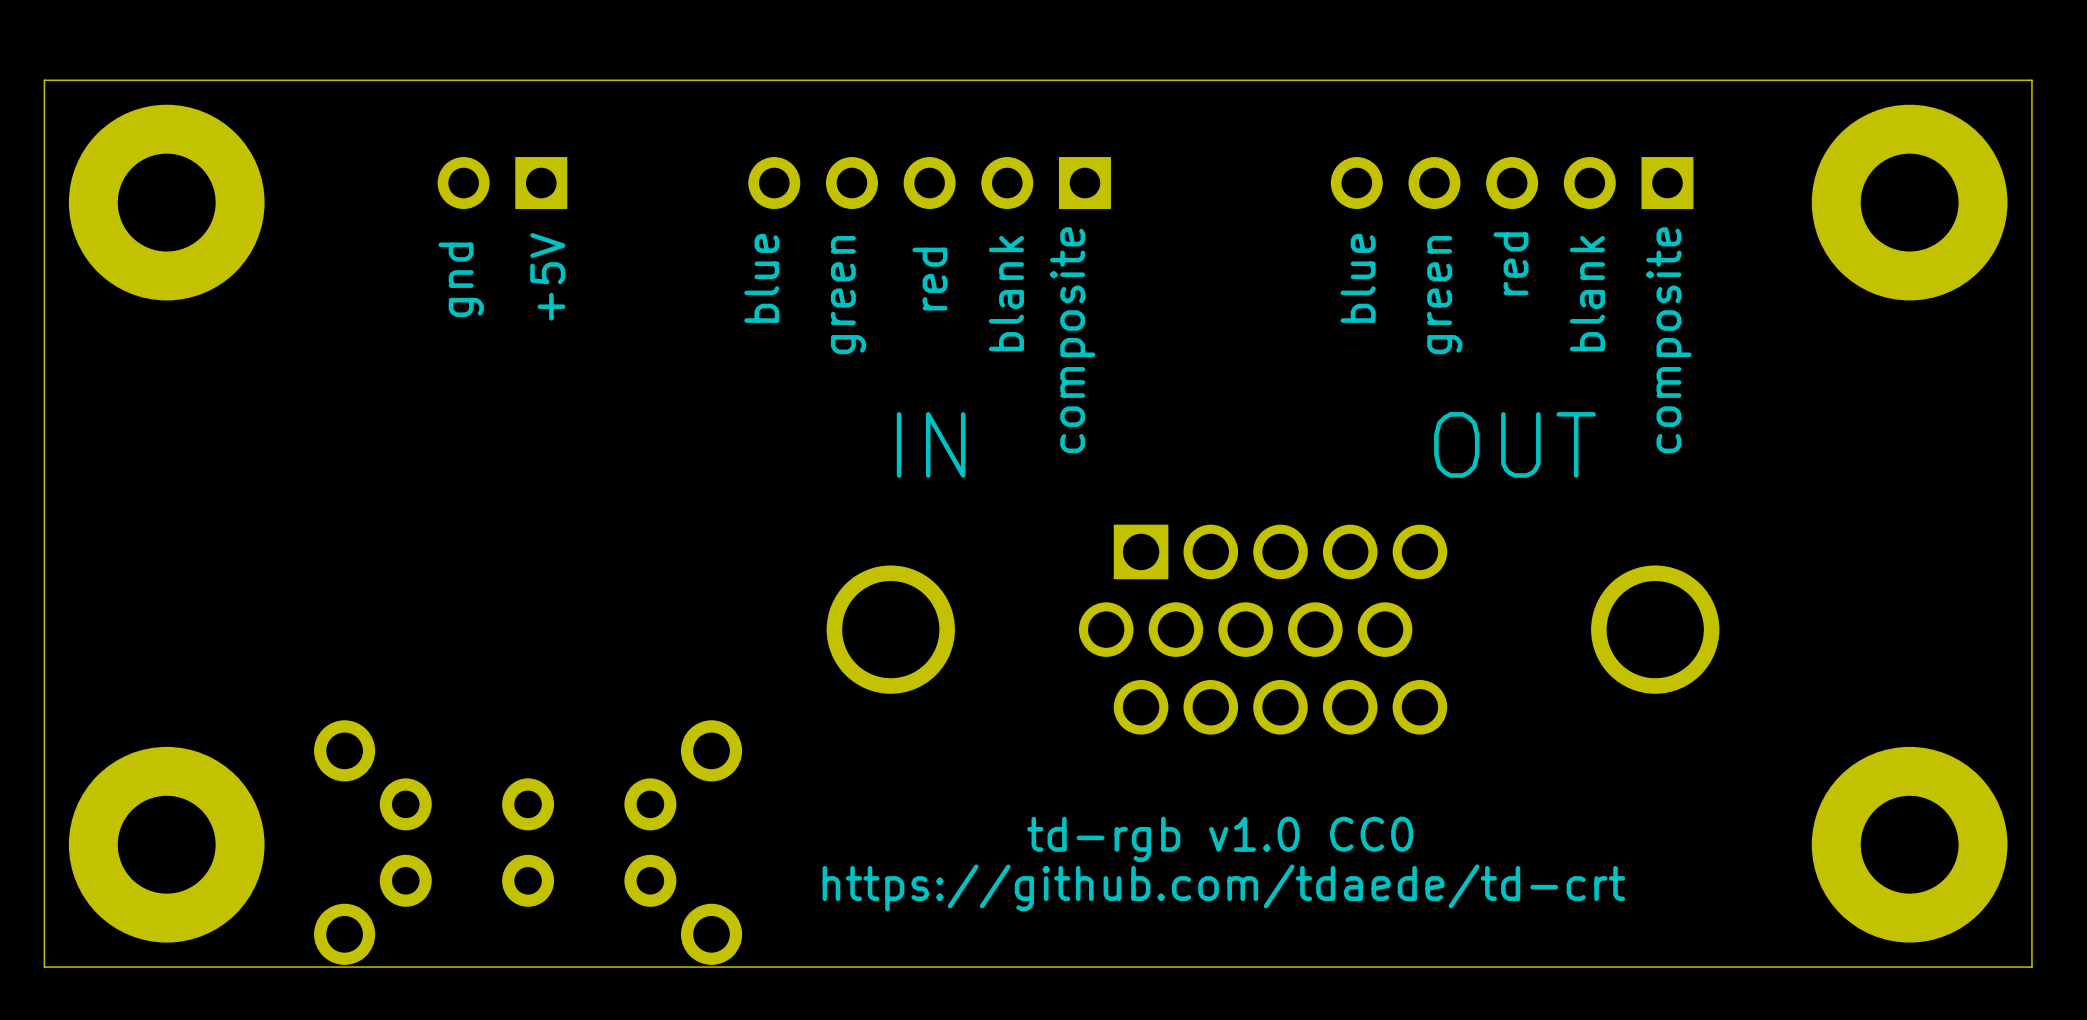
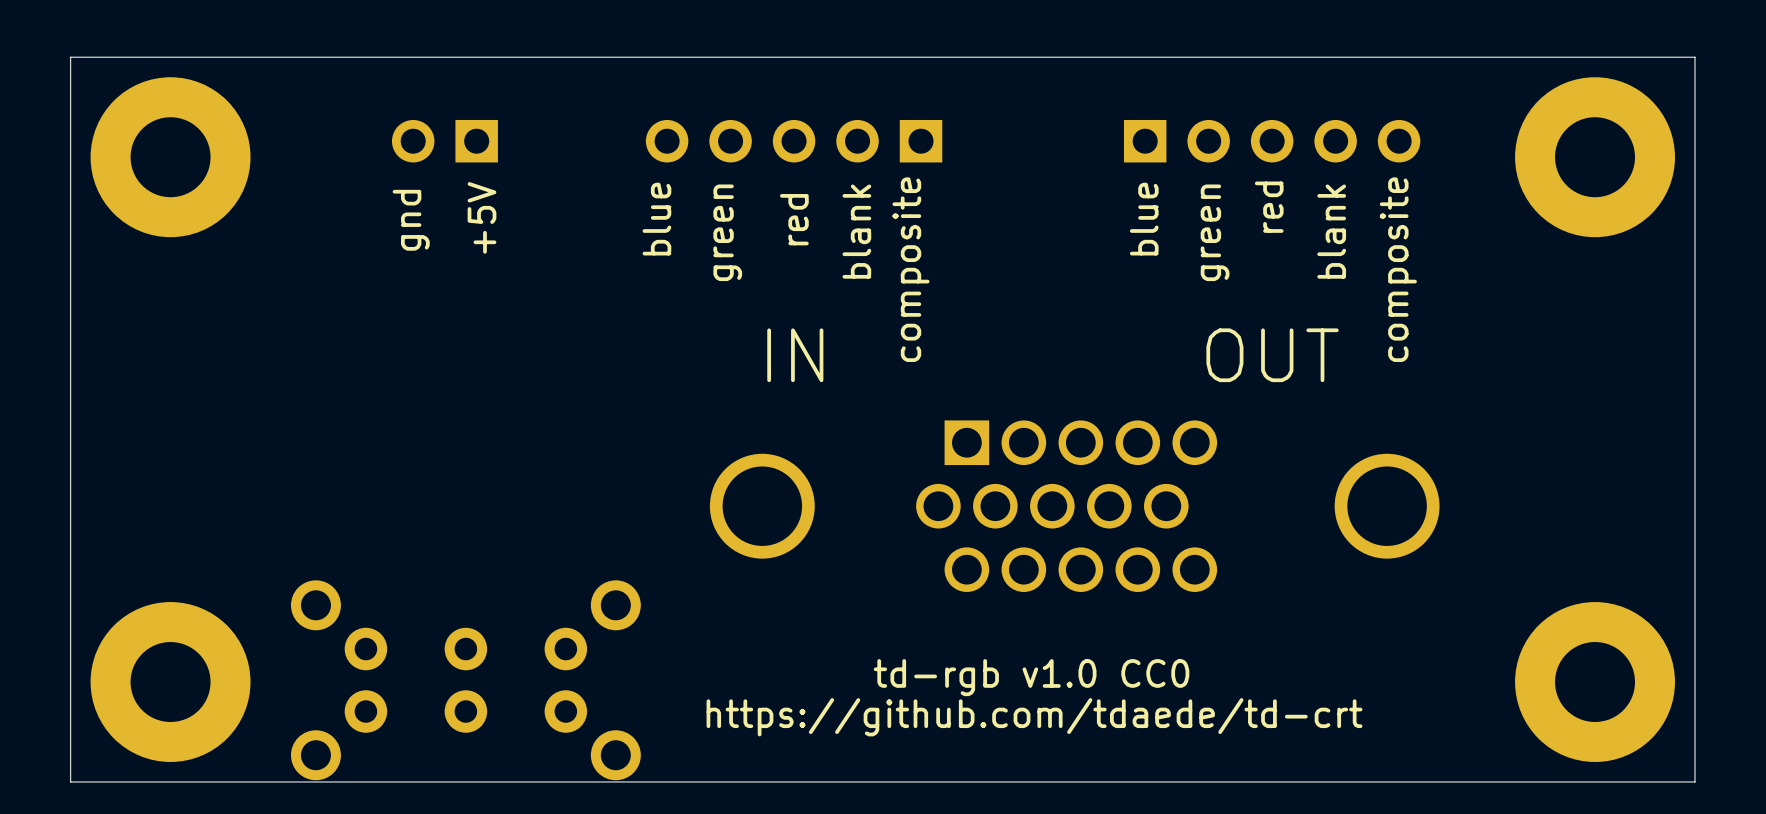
part rotation: 0° (1512, 183) -> 180° (1272, 141)

